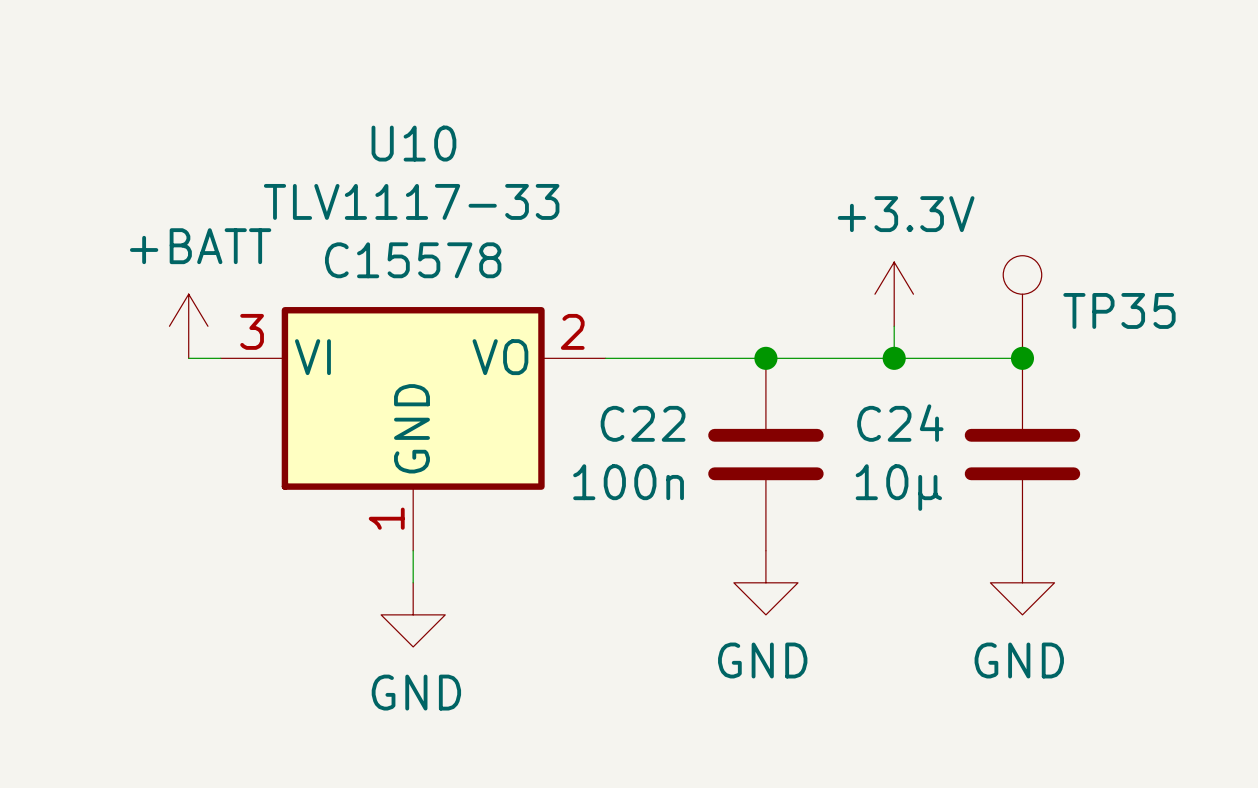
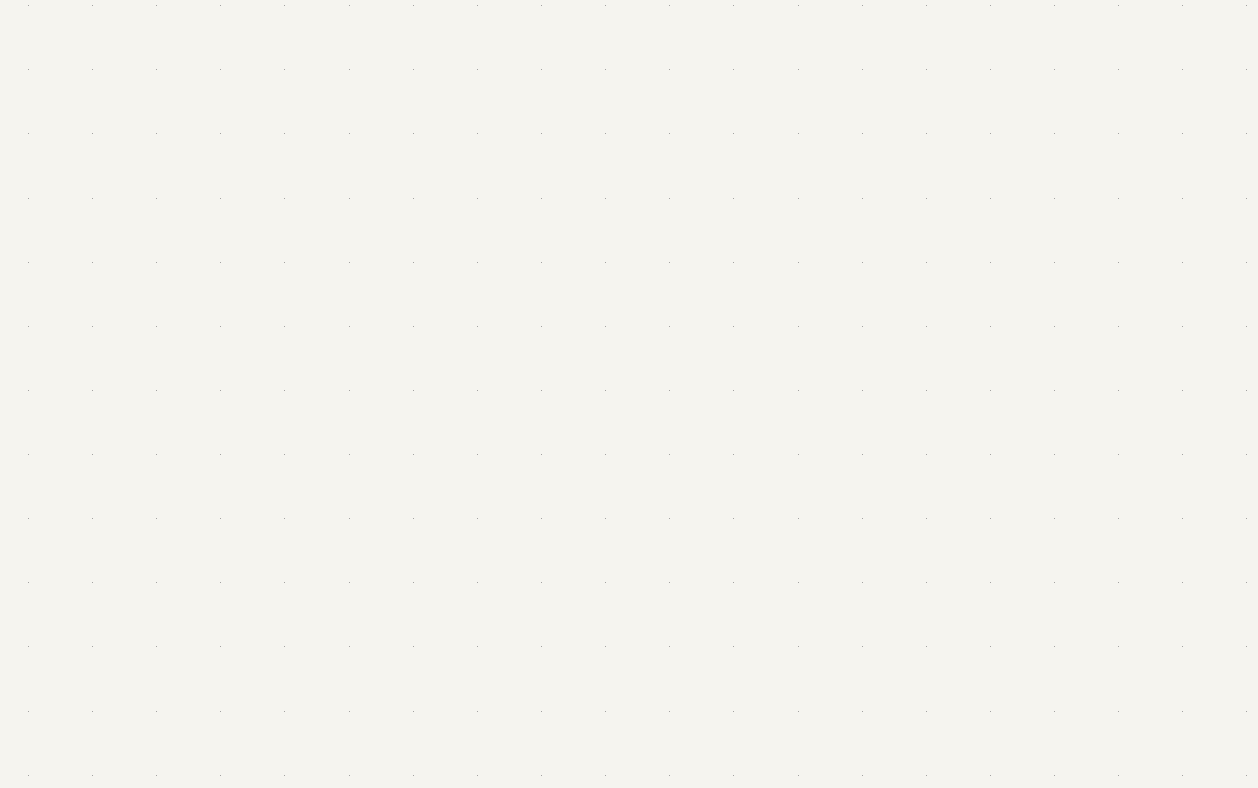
power symbol: +3.3V (894, 294) -> none
TP35: (1022, 307) -> none
power symbol: +BATT (188, 326) -> none
wire: (894, 326) (894, 358) -> none
wire: (188, 358) (220, 358) -> none
wire: (605, 358) (1022, 358) -> none
junction: (765, 358) -> none
junction: (894, 358) -> none
junction: (1022, 358) -> none
U10: TLV1117-33 (413, 428) -> none
C22: 100n (765, 454) -> none
C24: 10µ (1022, 454) -> none
wire: (413, 550) (413, 582) -> none
power symbol: GND (765, 582) -> none
power symbol: GND (1022, 582) -> none
power symbol: GND (413, 614) -> none

